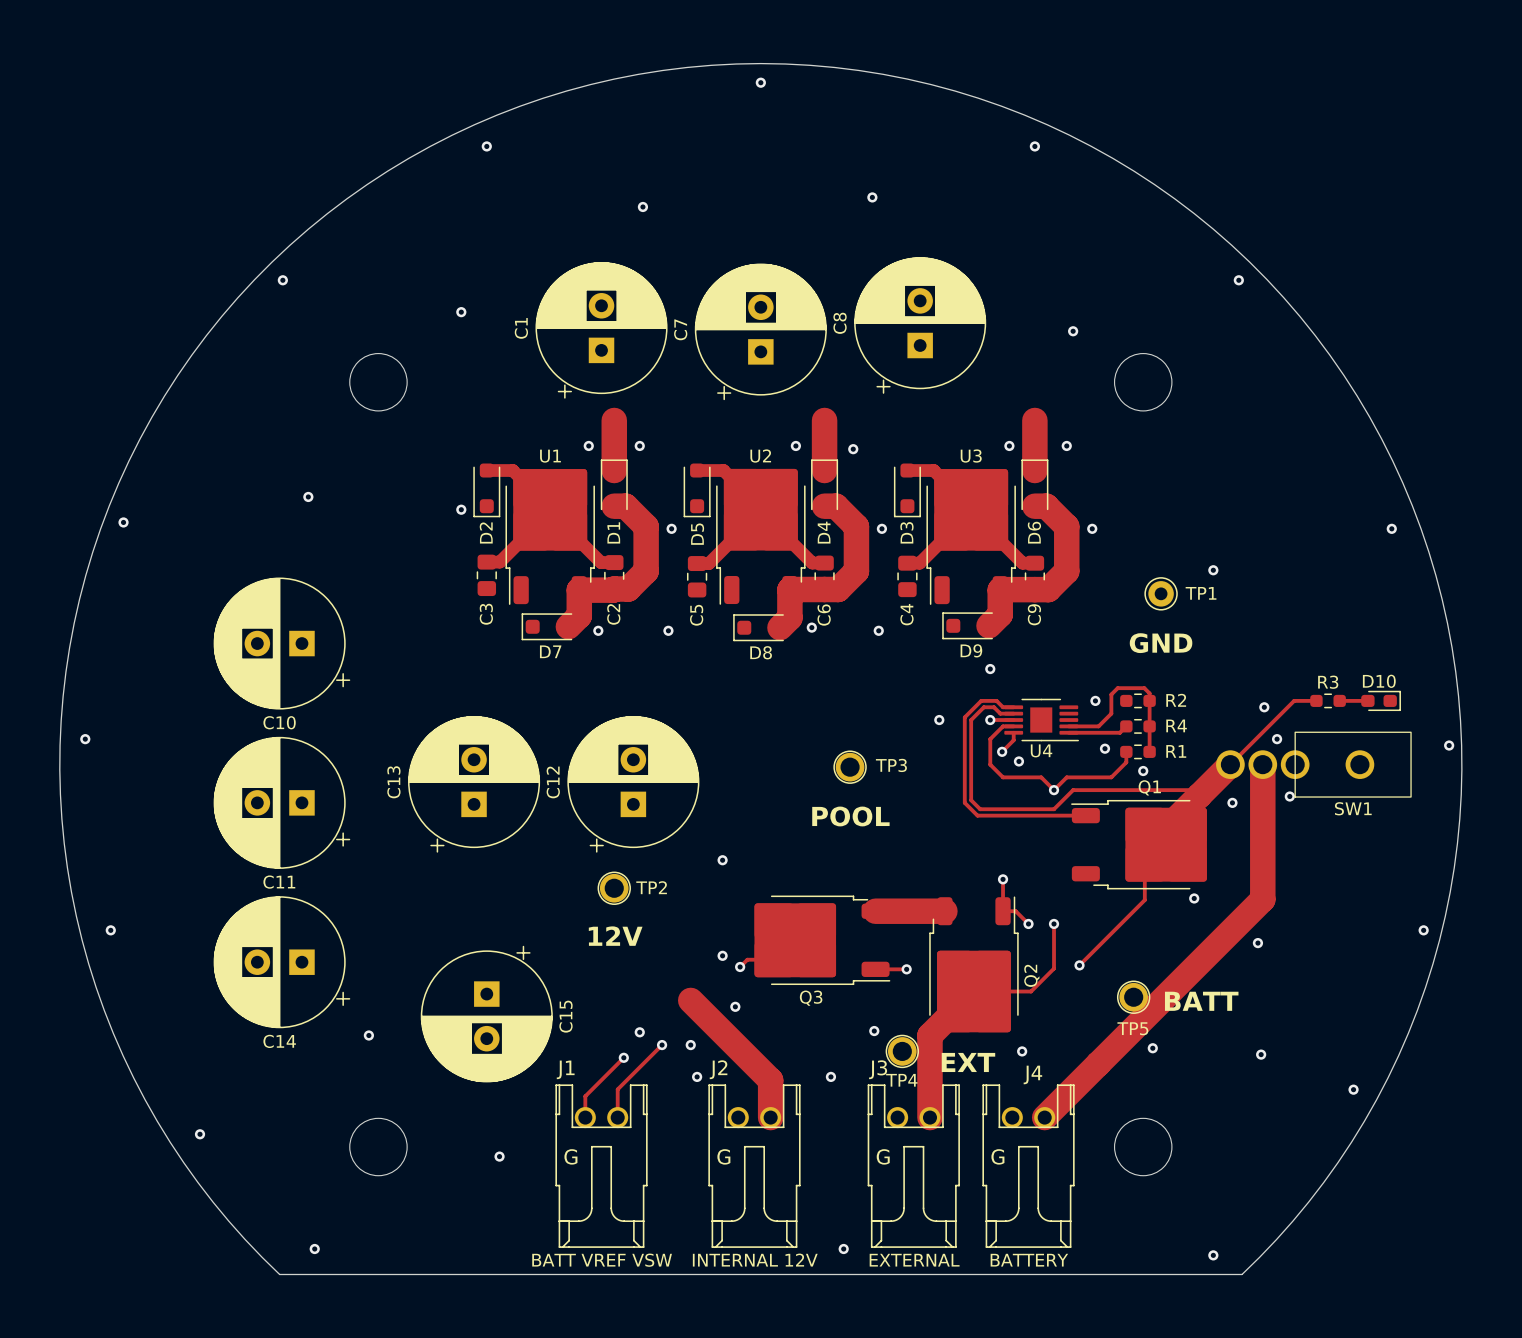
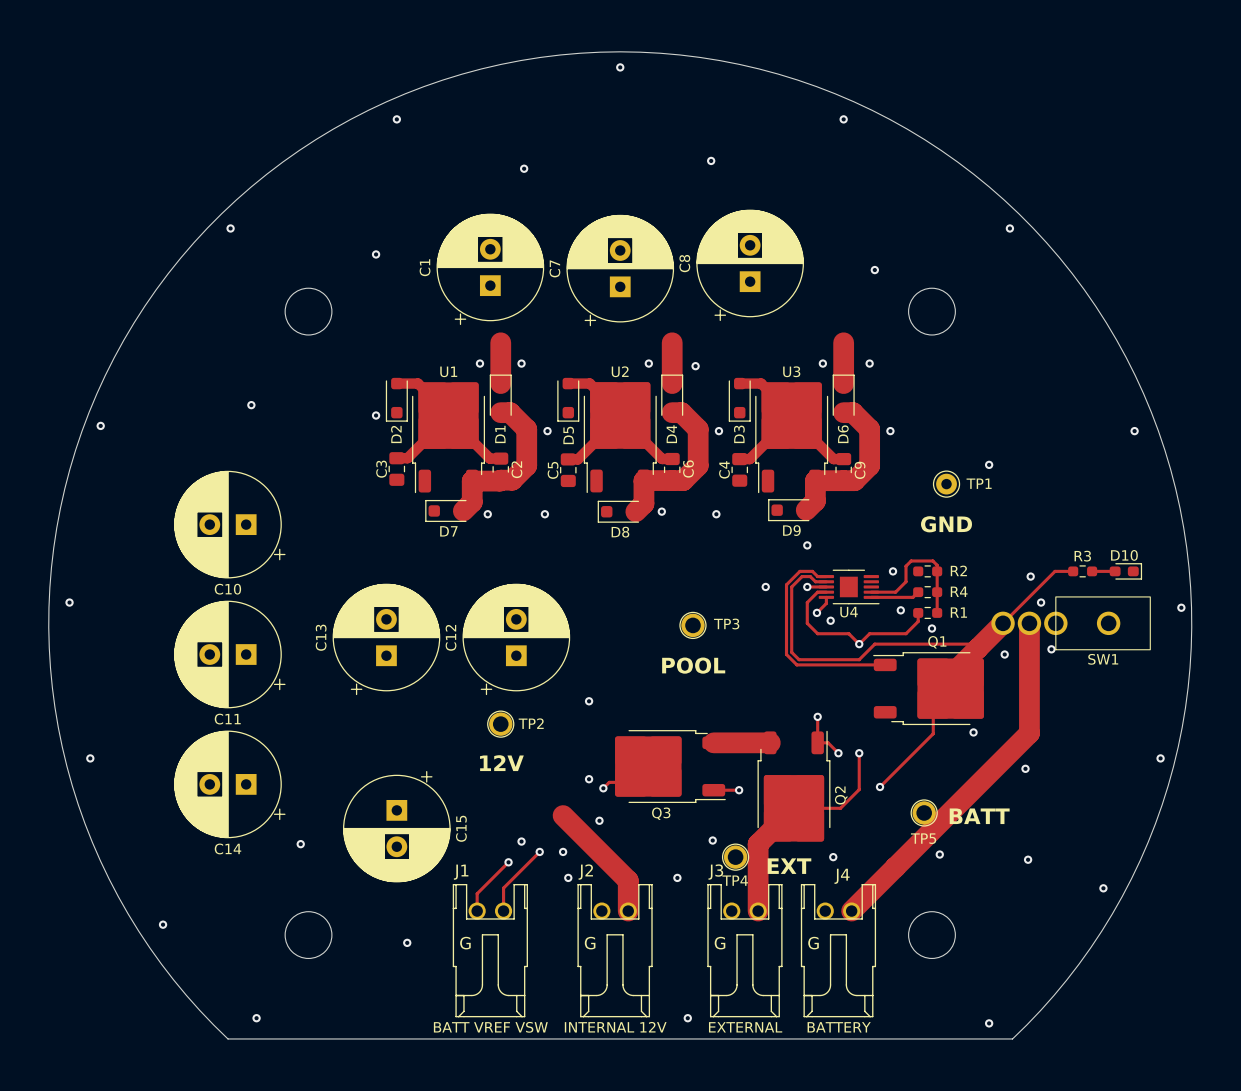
C3 name position: C3 (486, 614) -> C3 (381, 469)
C2 name position: C2 (613, 614) -> C2 (516, 469)
C4 name position: C4 (906, 614) -> C4 (724, 469)
C9 name position: C9 (1034, 614) -> C9 (860, 470)
C5 name position: C5 (696, 615) -> C5 (553, 470)
C6 name position: C6 (824, 615) -> C6 (688, 468)

